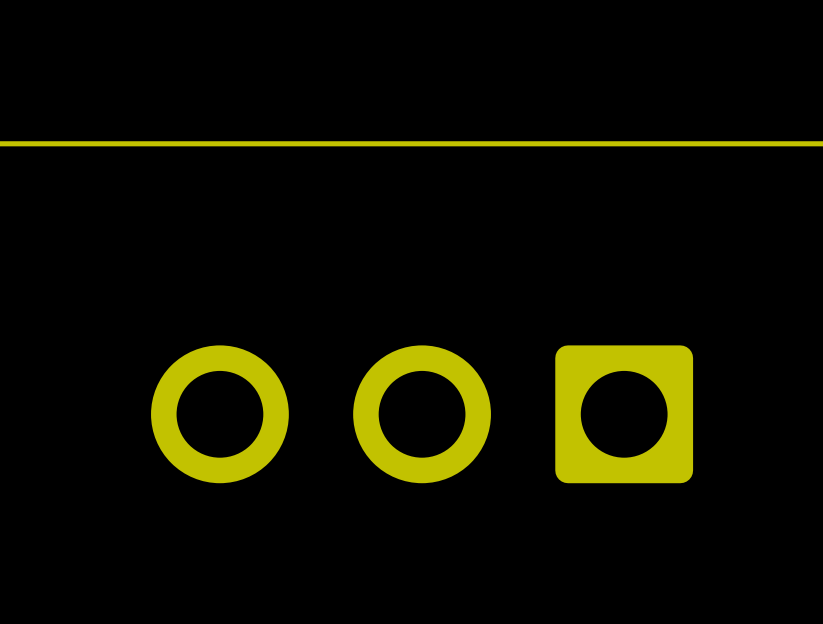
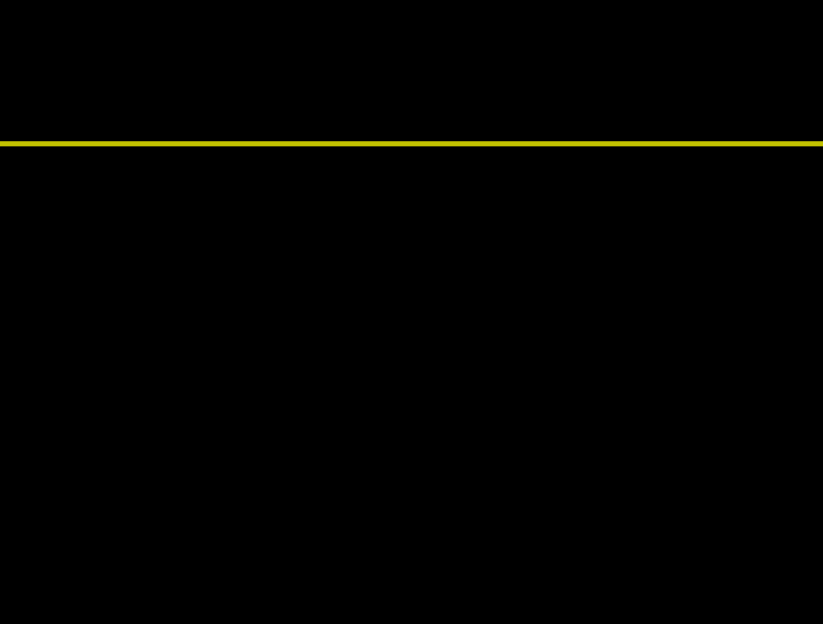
part: (422, 414) -> none

